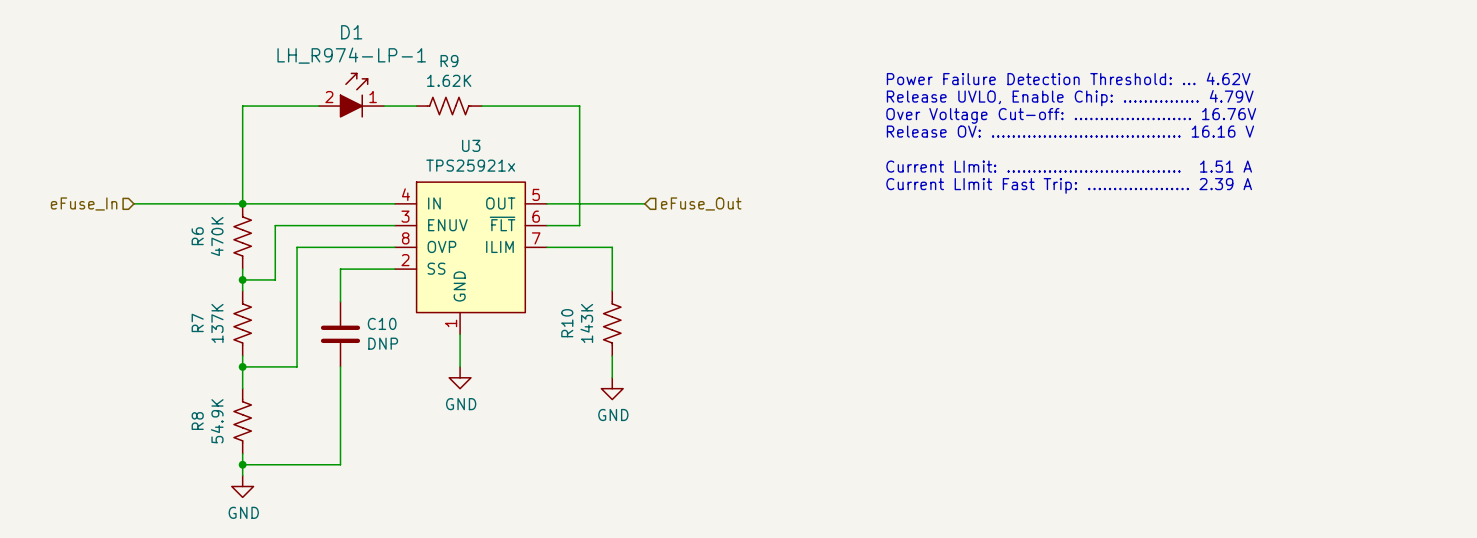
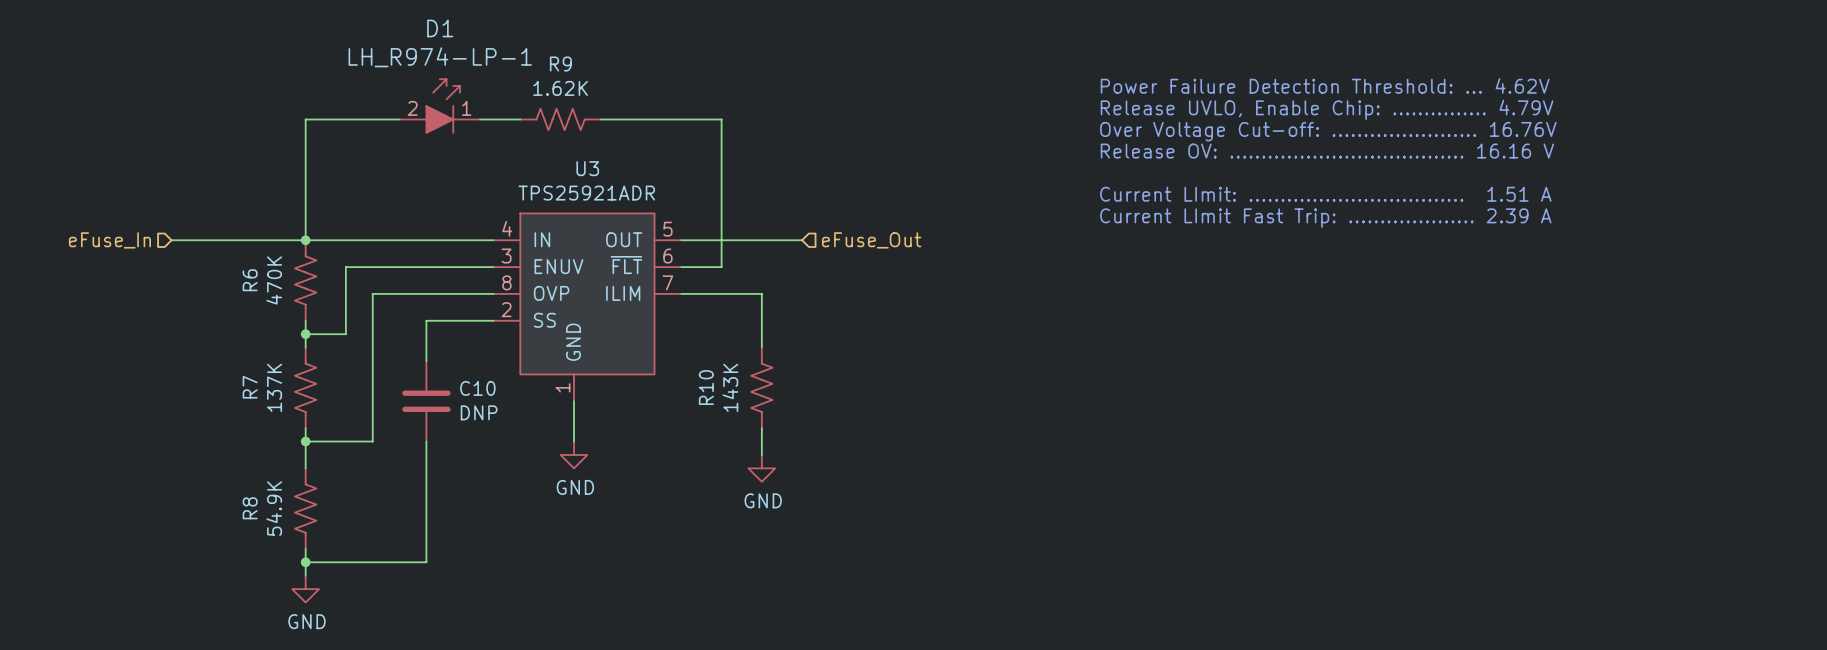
U3 value: TPS25921x (470, 165) -> TPS25921ADR (586, 193)

